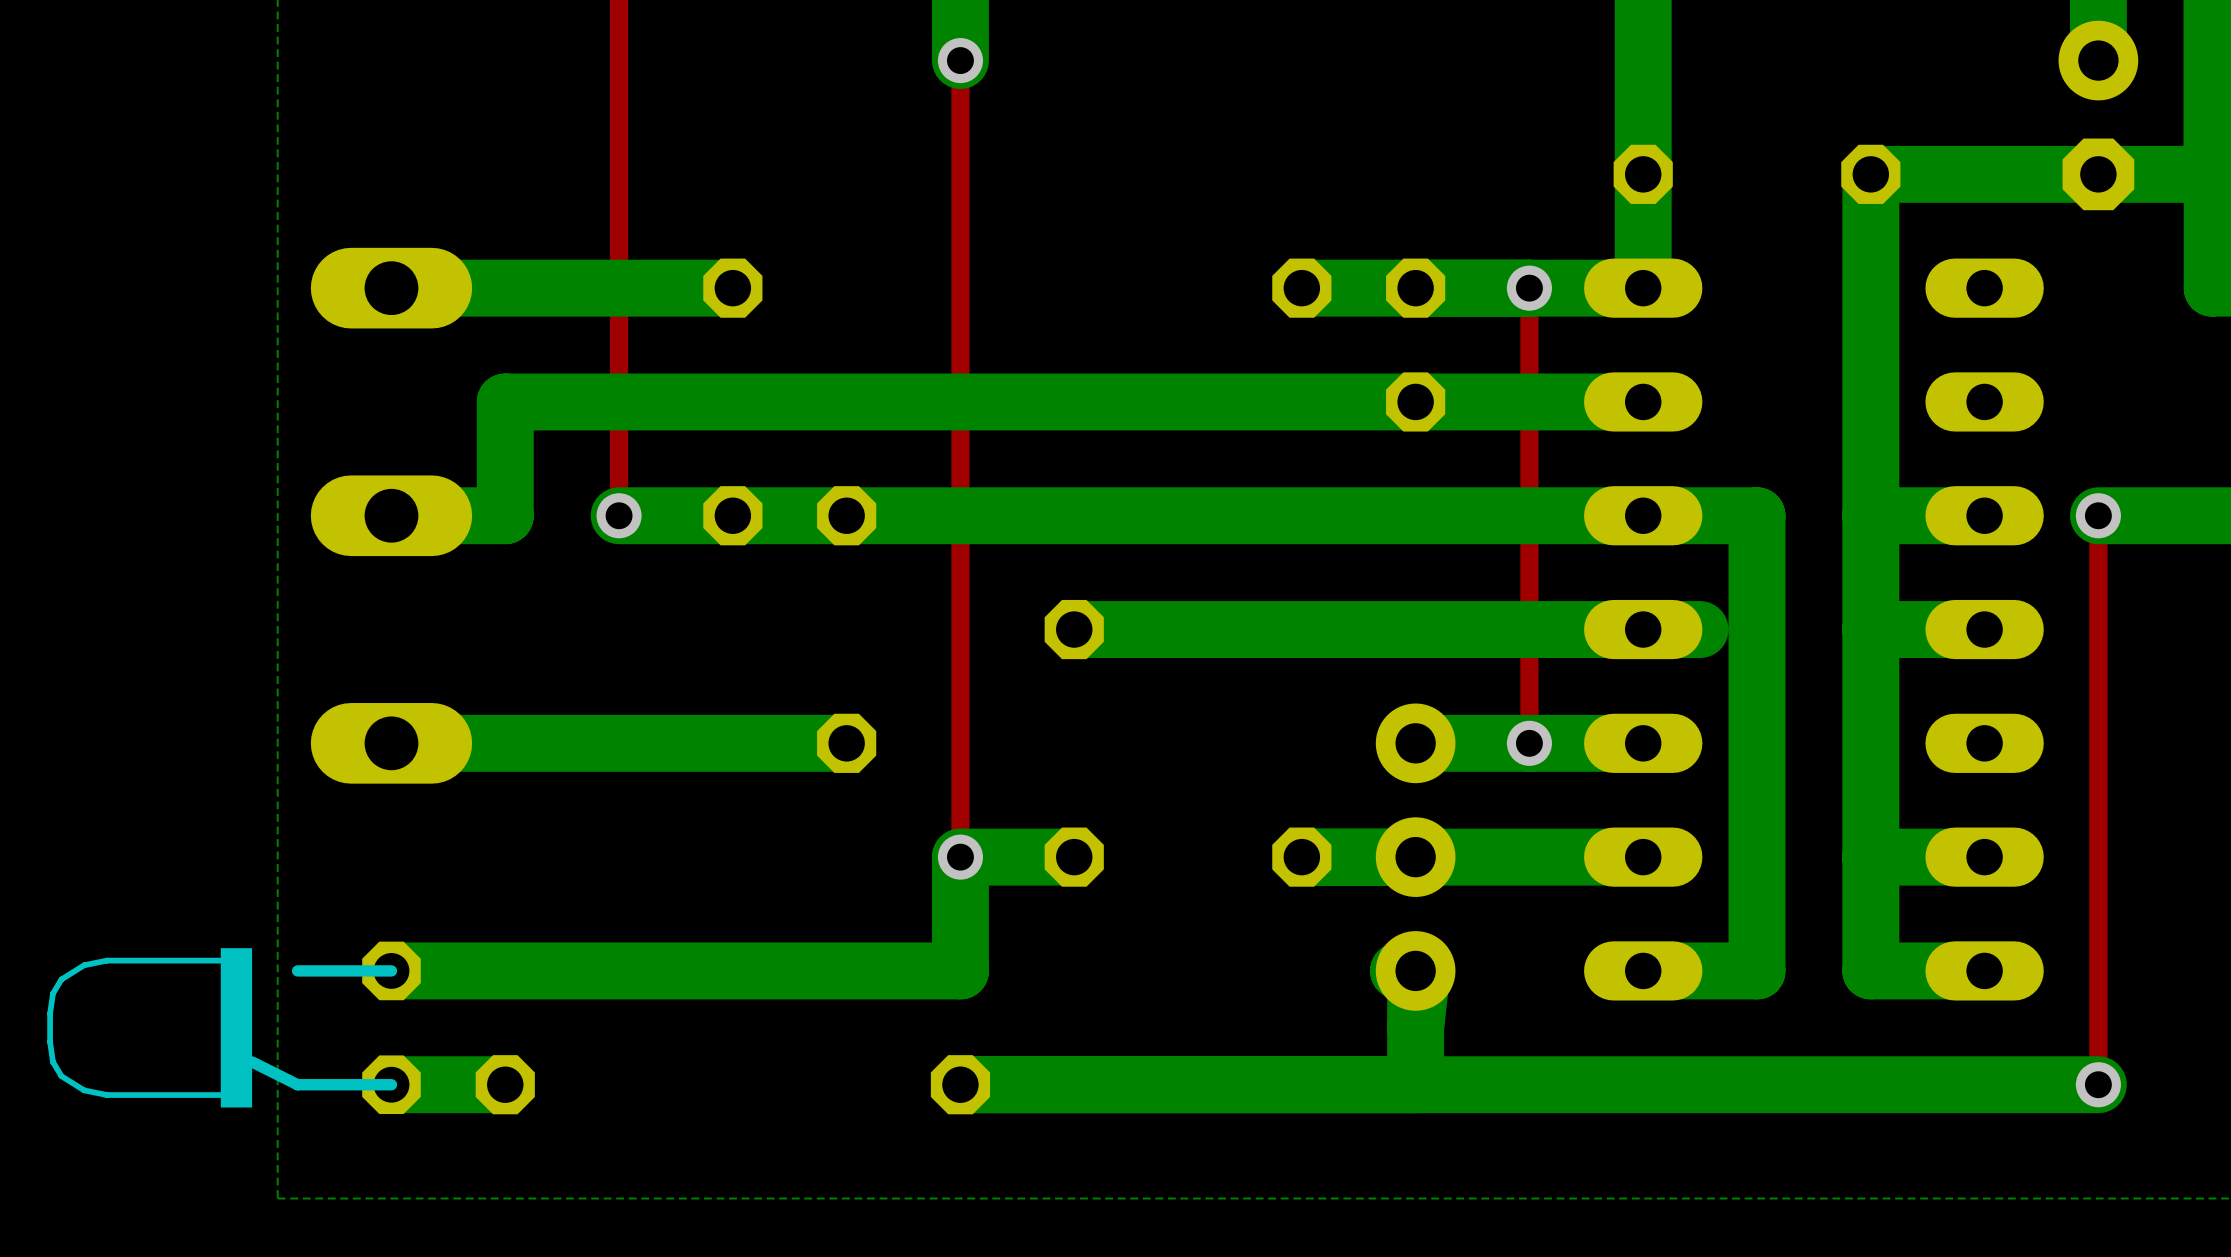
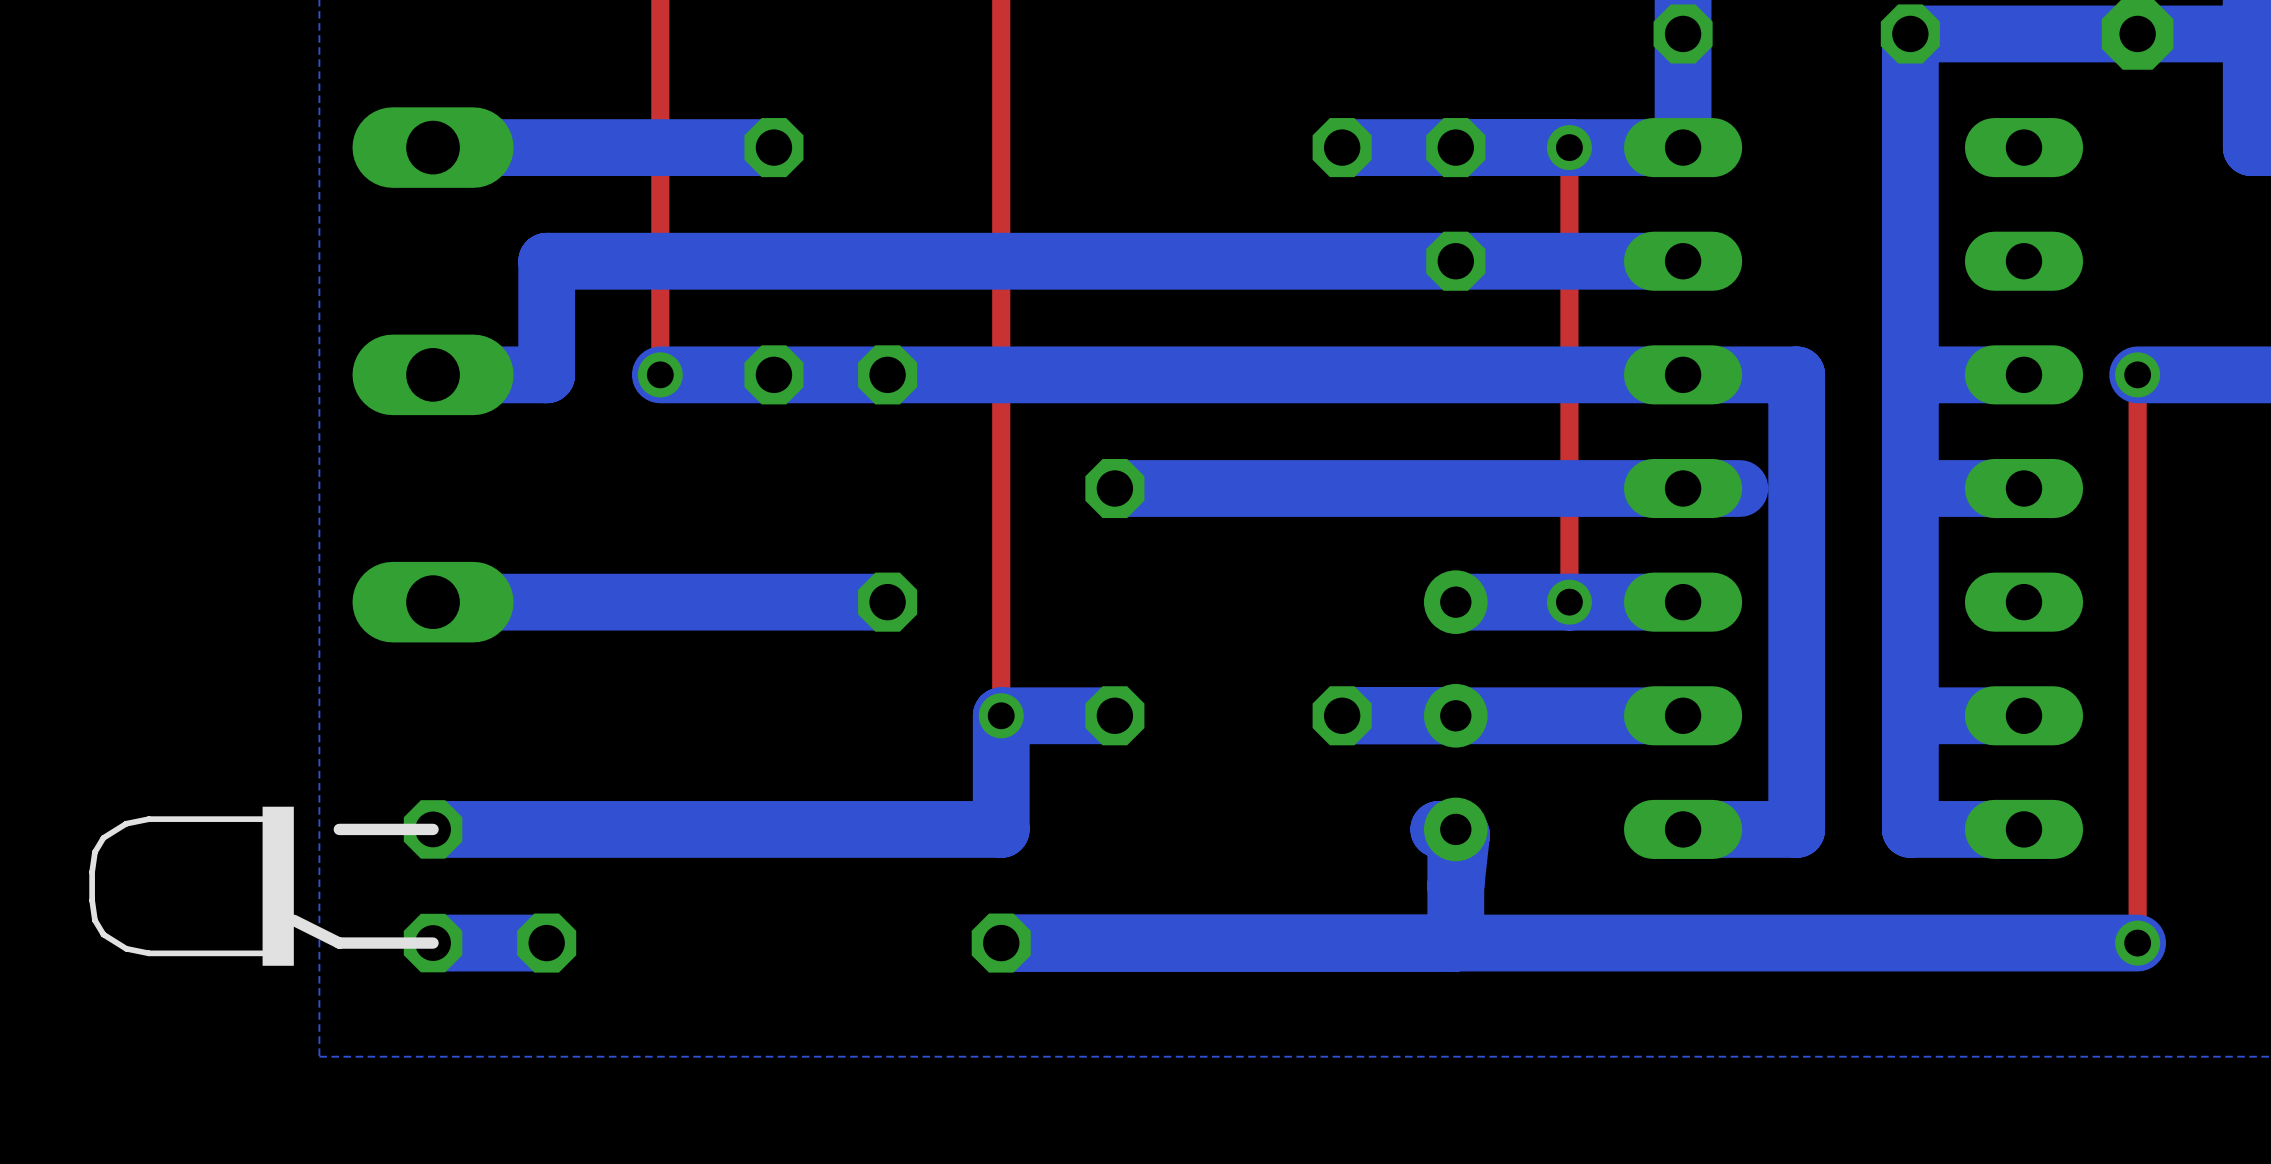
part footprint: [1375, 703, 1456, 1011] -> [1423, 570, 1488, 862]

